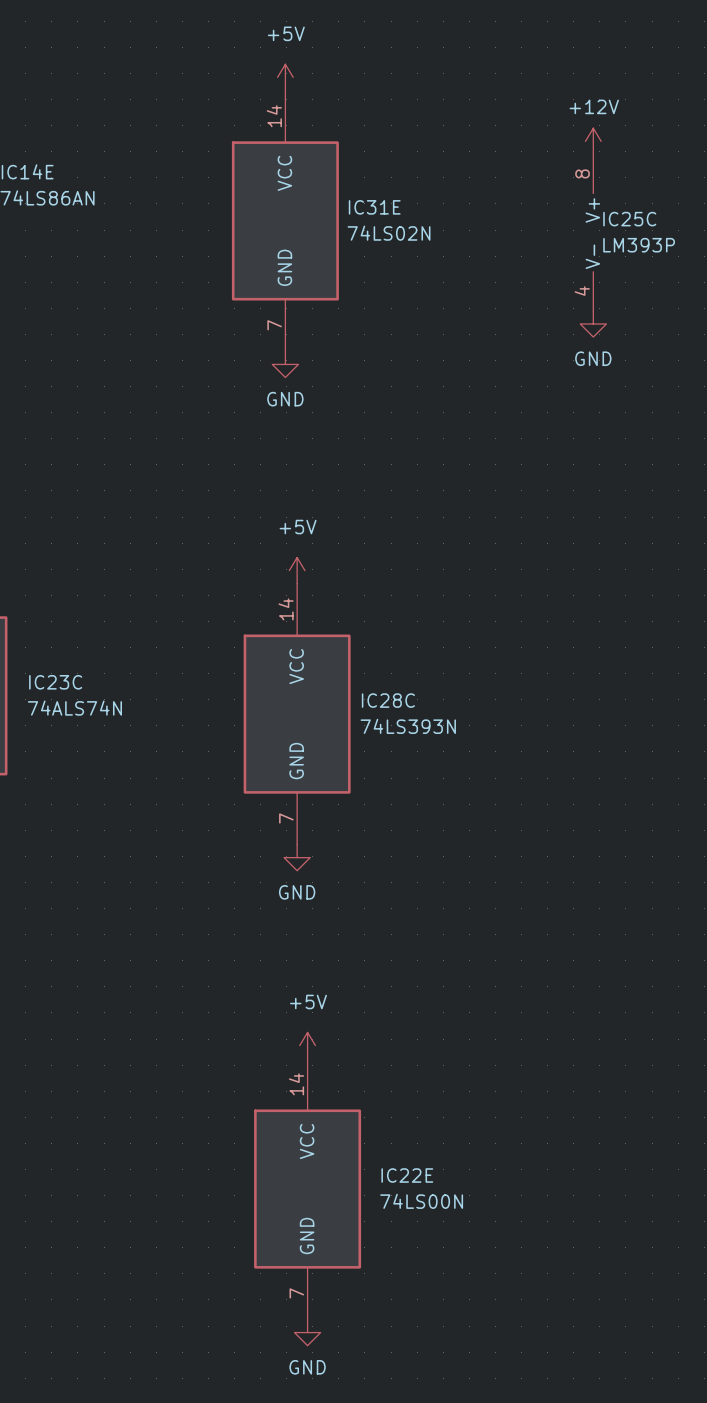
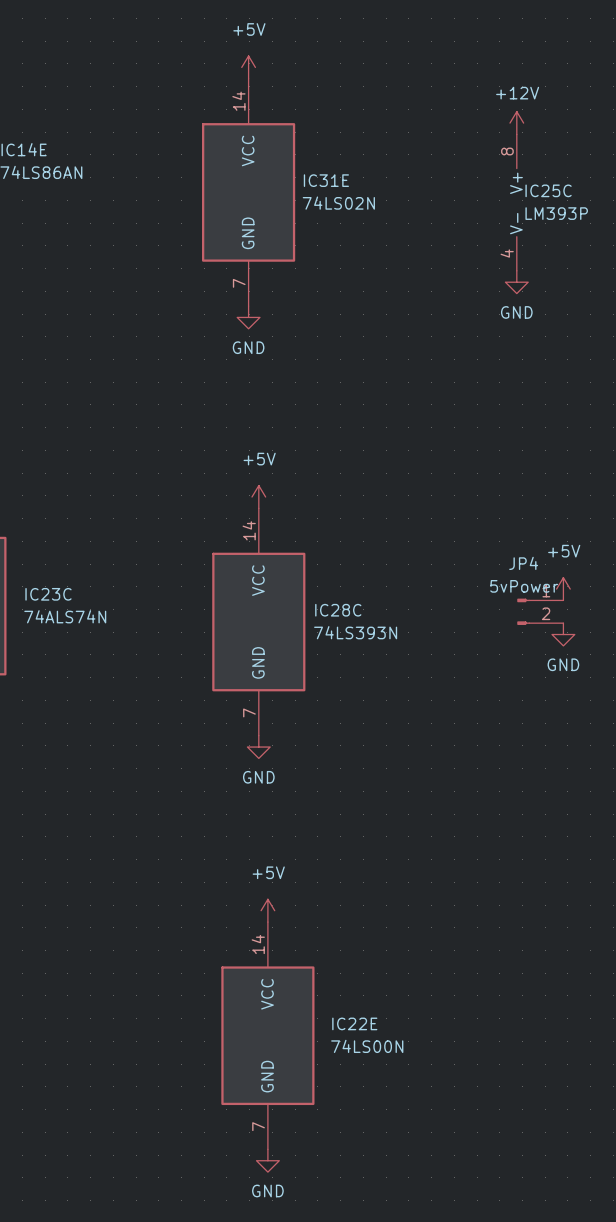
power symbol: none -> +5V (563, 589)
JP4: none -> 5vPower (540, 611)
power symbol: none -> GND (563, 634)

